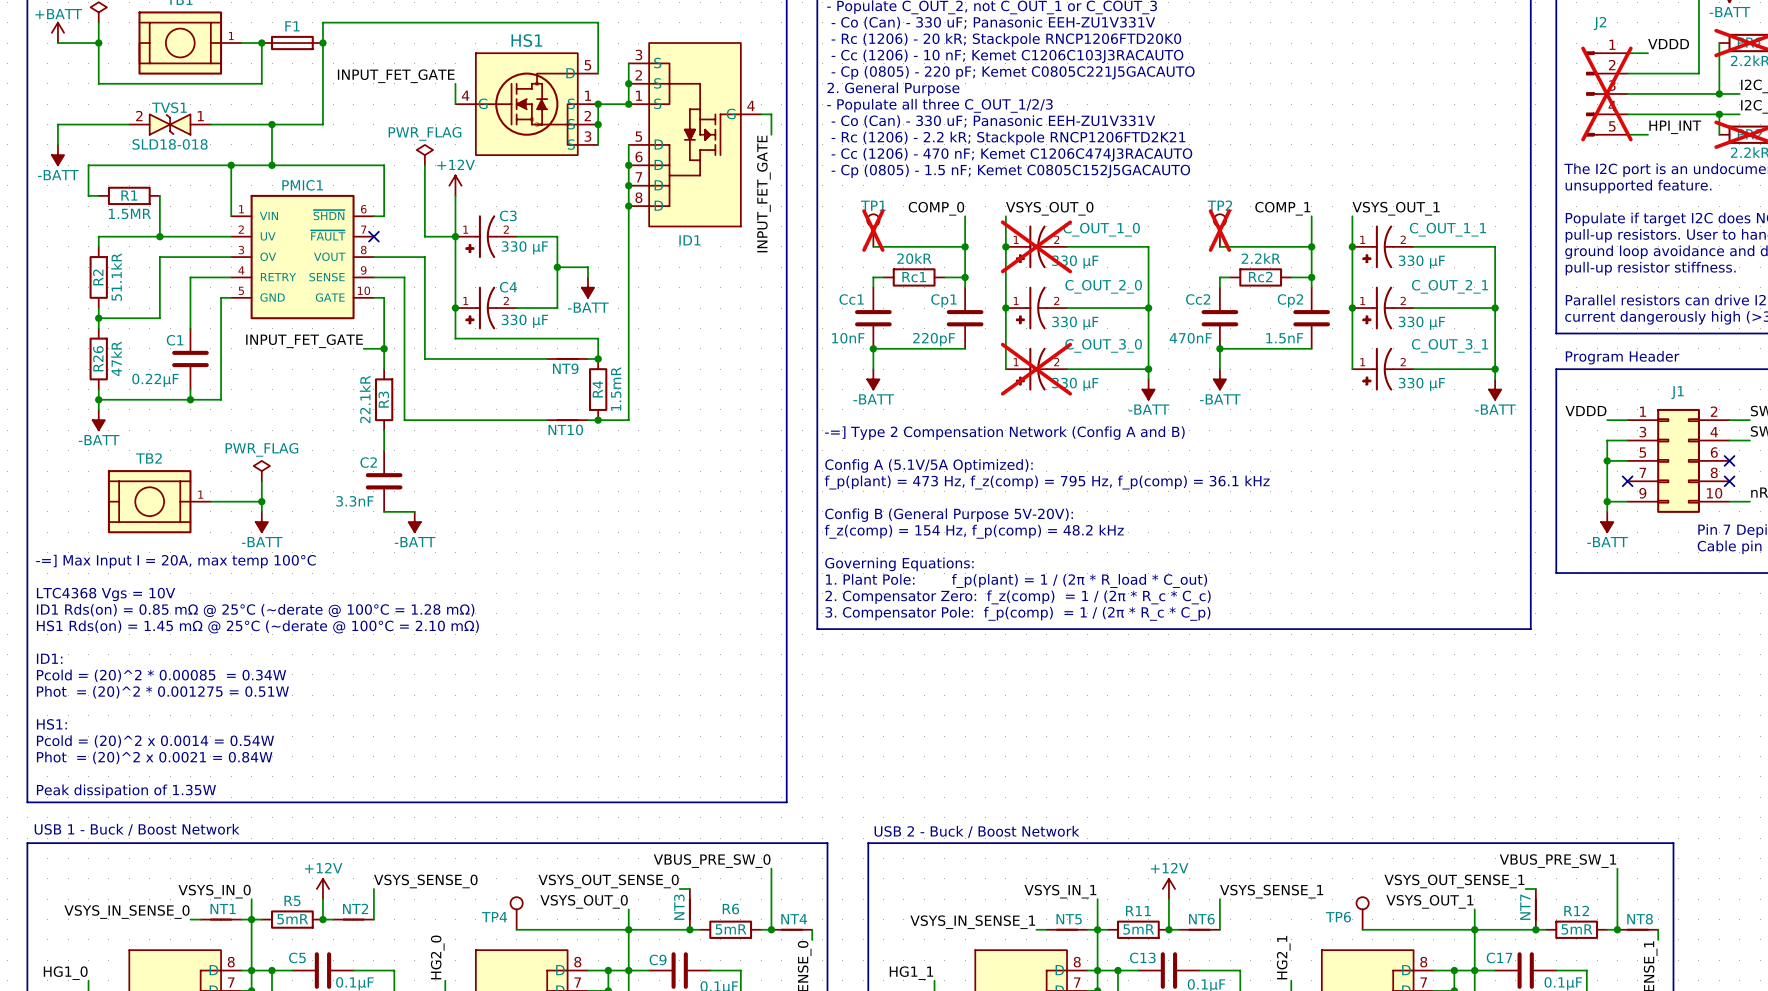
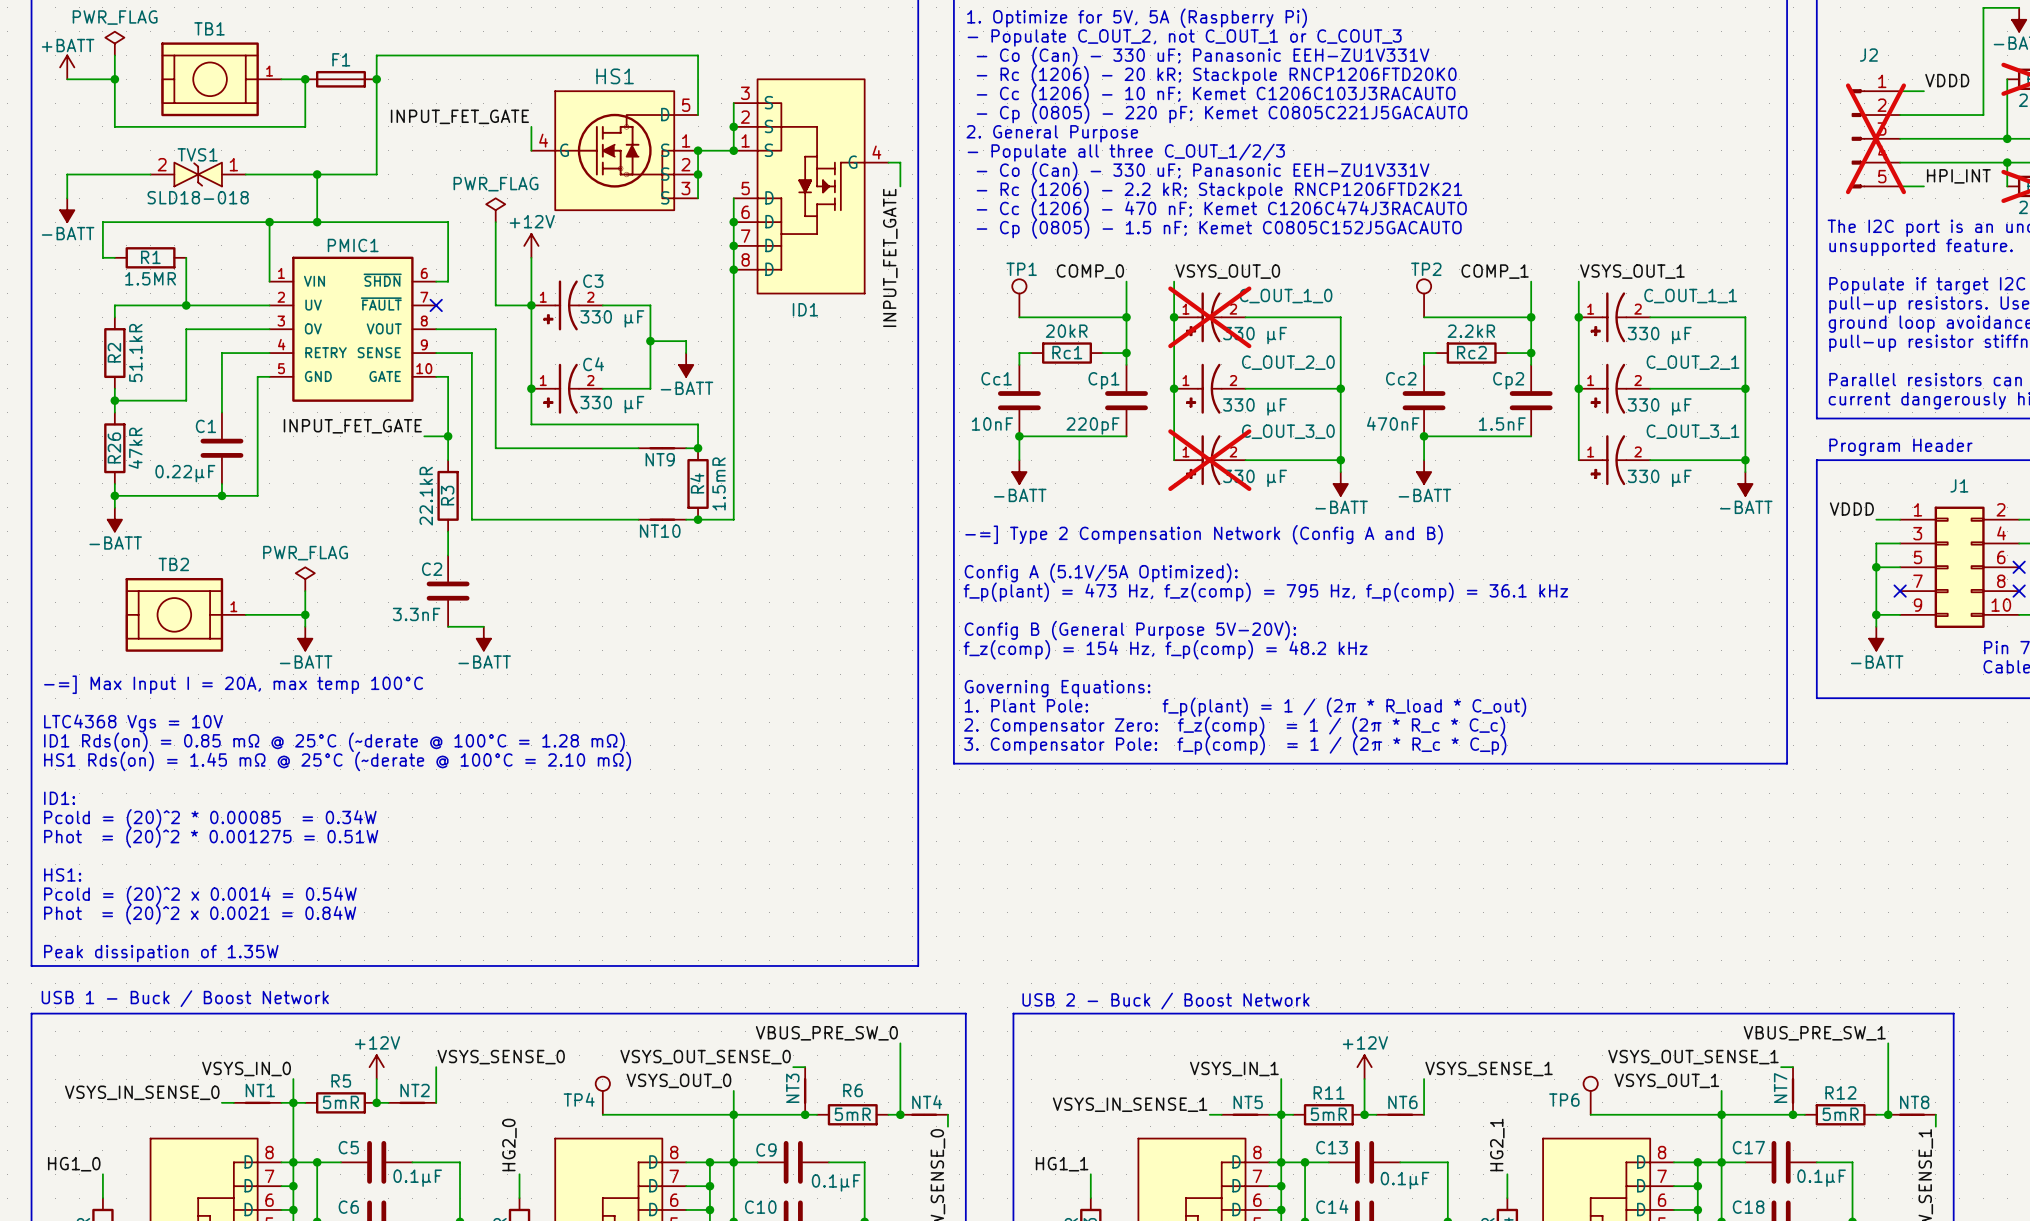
TP1 do-not-place cross: (873, 230) -> none
TP2 do-not-place cross: (1219, 230) -> none

